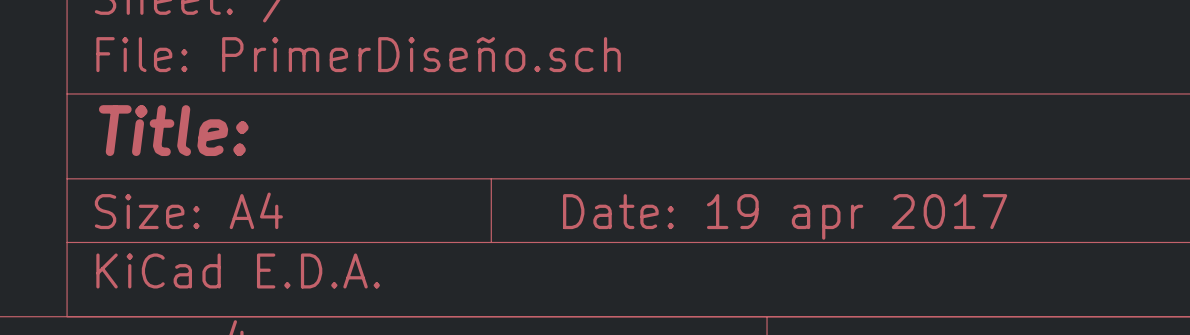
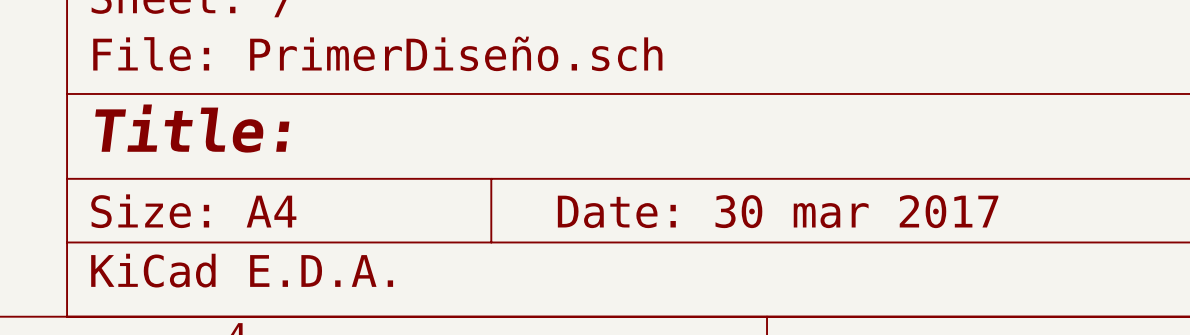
title block: Date: 19 apr 2017 (785, 216) -> Date: 30 mar 2017 (778, 211)

